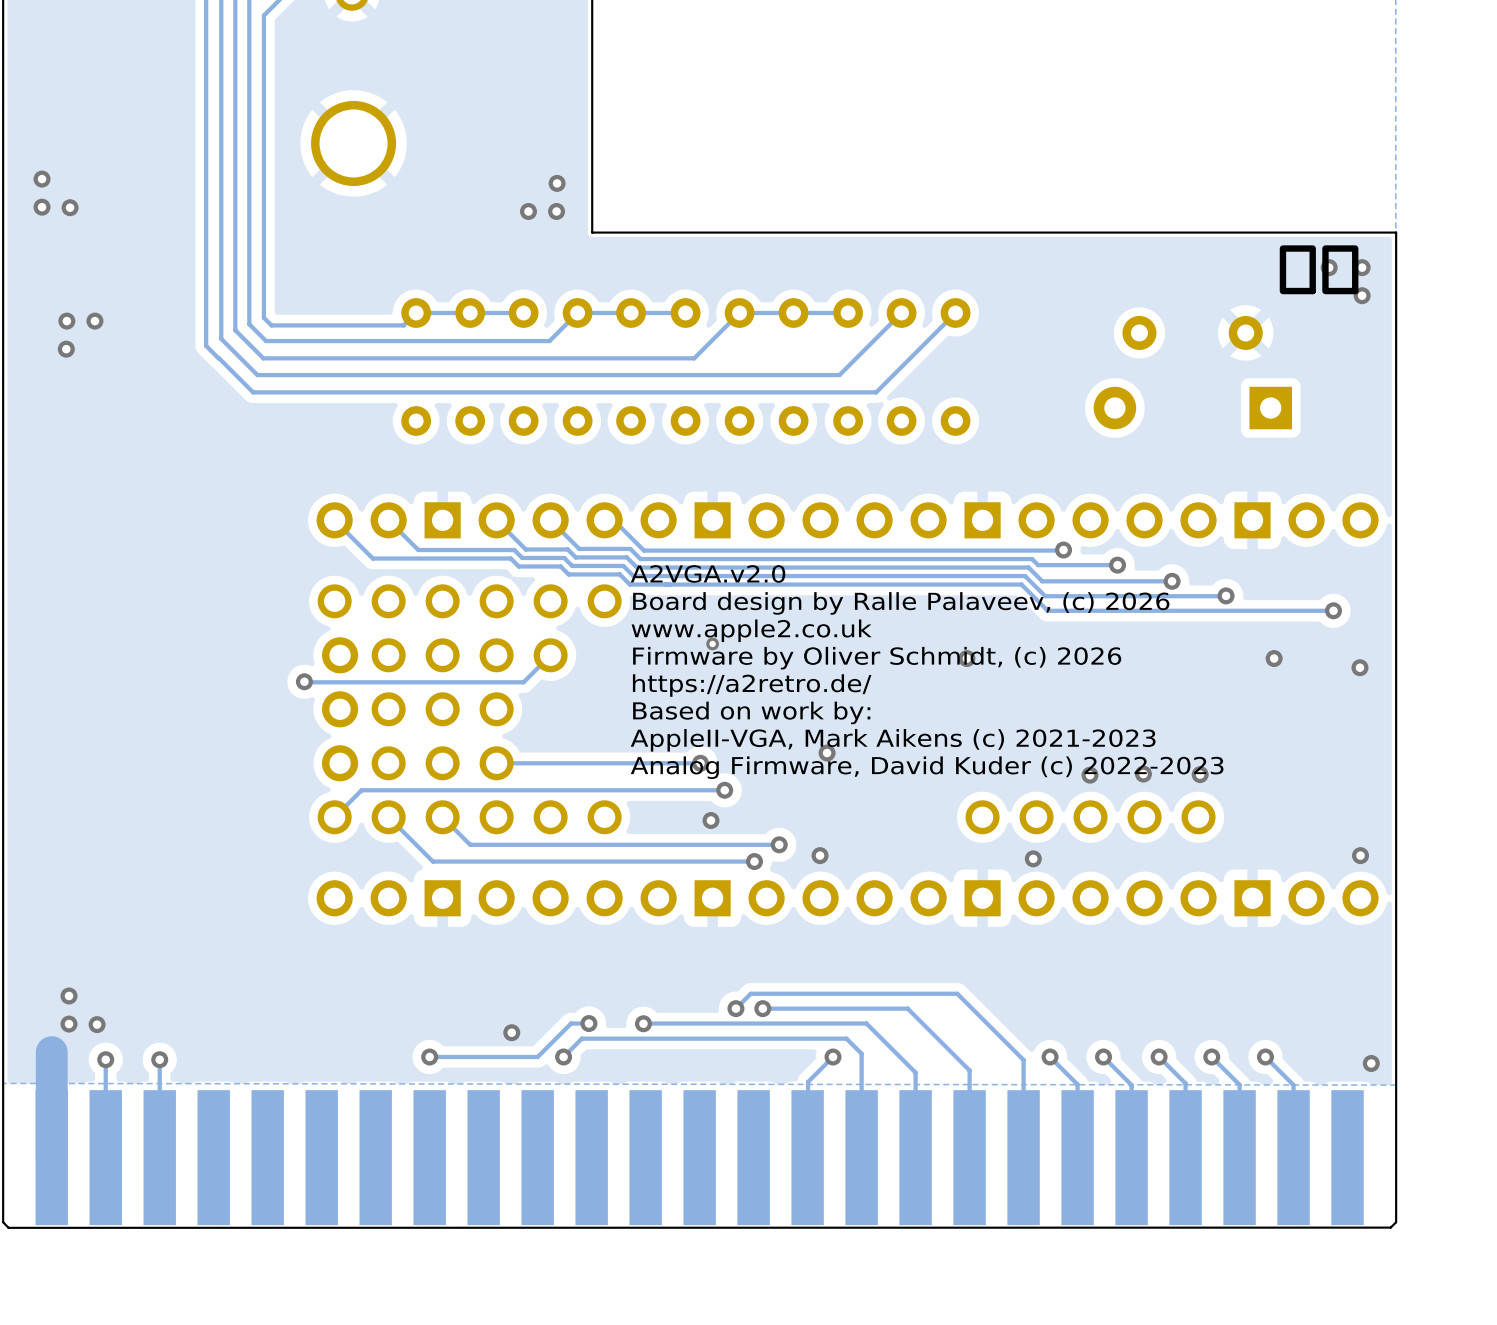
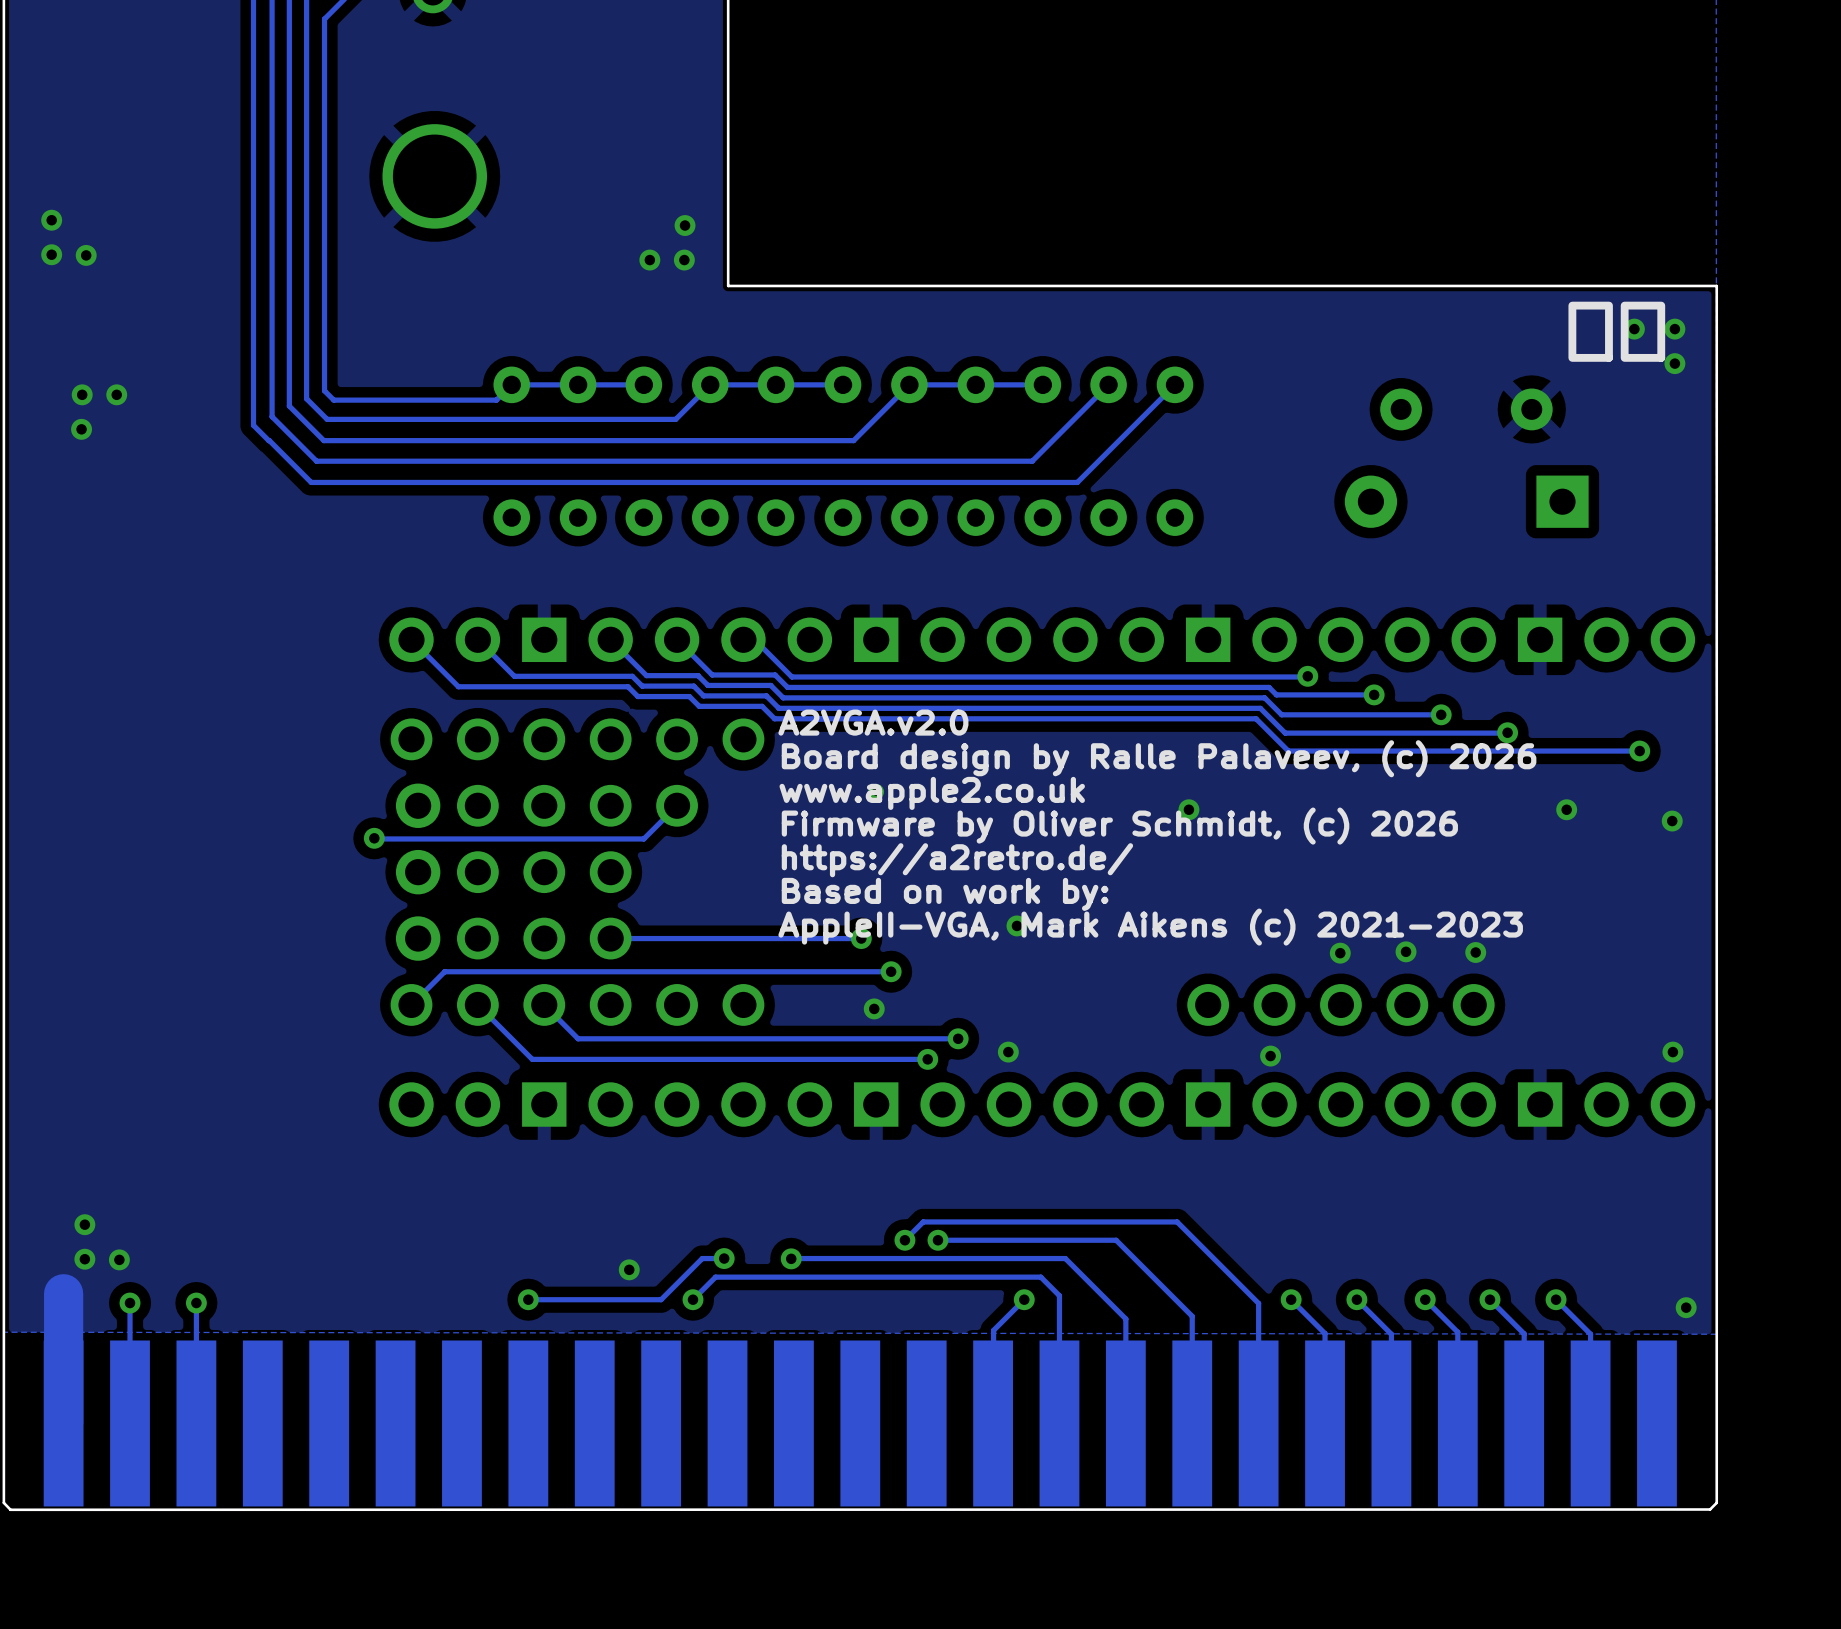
text position: A2VGA.v2.0 (708, 573) -> A2VGA.v2.0 (873, 722)
text position: Board design by Ralle Palaveev, (c) 2026 (901, 603) -> Board design by Ralle Palaveev, (c) 2026 (1159, 758)
text position: www.apple2.co.uk (751, 630) -> www.apple2.co.uk (932, 793)
text position: Firmware by Oliver Schmidt, (c) 2026 (877, 658) -> Firmware by Oliver Schmidt, (c) 2026 (1119, 826)
text position: https://a2retro.de/ (752, 685) -> https://a2retro.de/ (957, 860)
text position: Based on work by: (751, 712) -> Based on work by: (945, 894)
text position: AppleII-VGA, Mark Aikens (c) 2021-2023 (893, 740) -> AppleII-VGA, Mark Aikens (c) 2021-2023 (1150, 927)
text: Analog Firmware, David Kuder (c) 2022-2023 (927, 767) -> none

